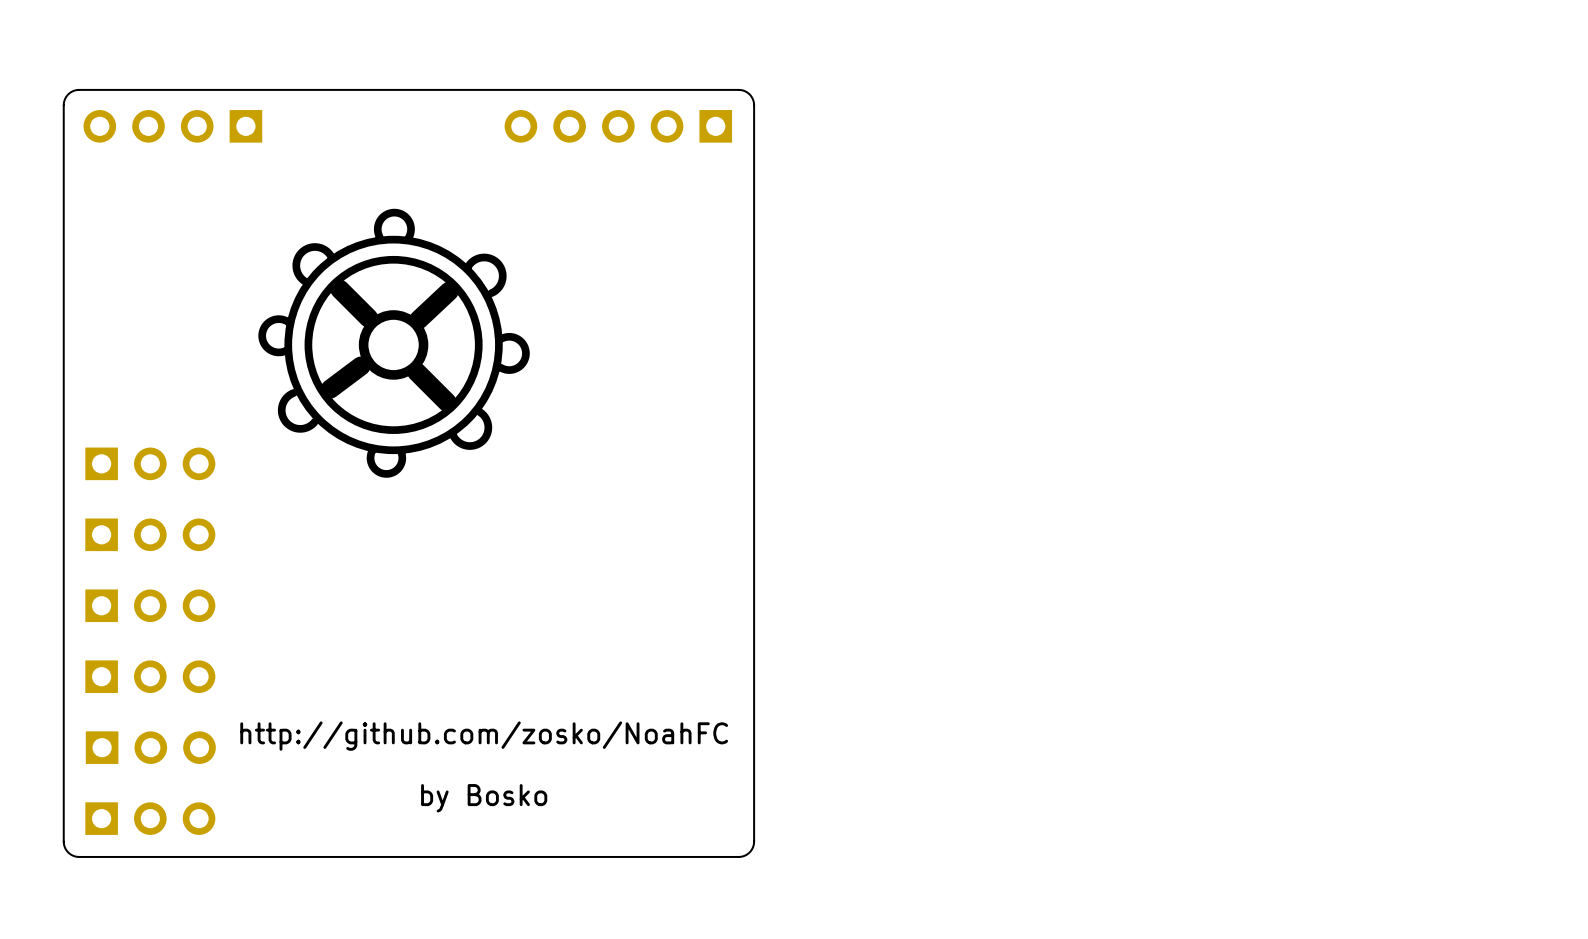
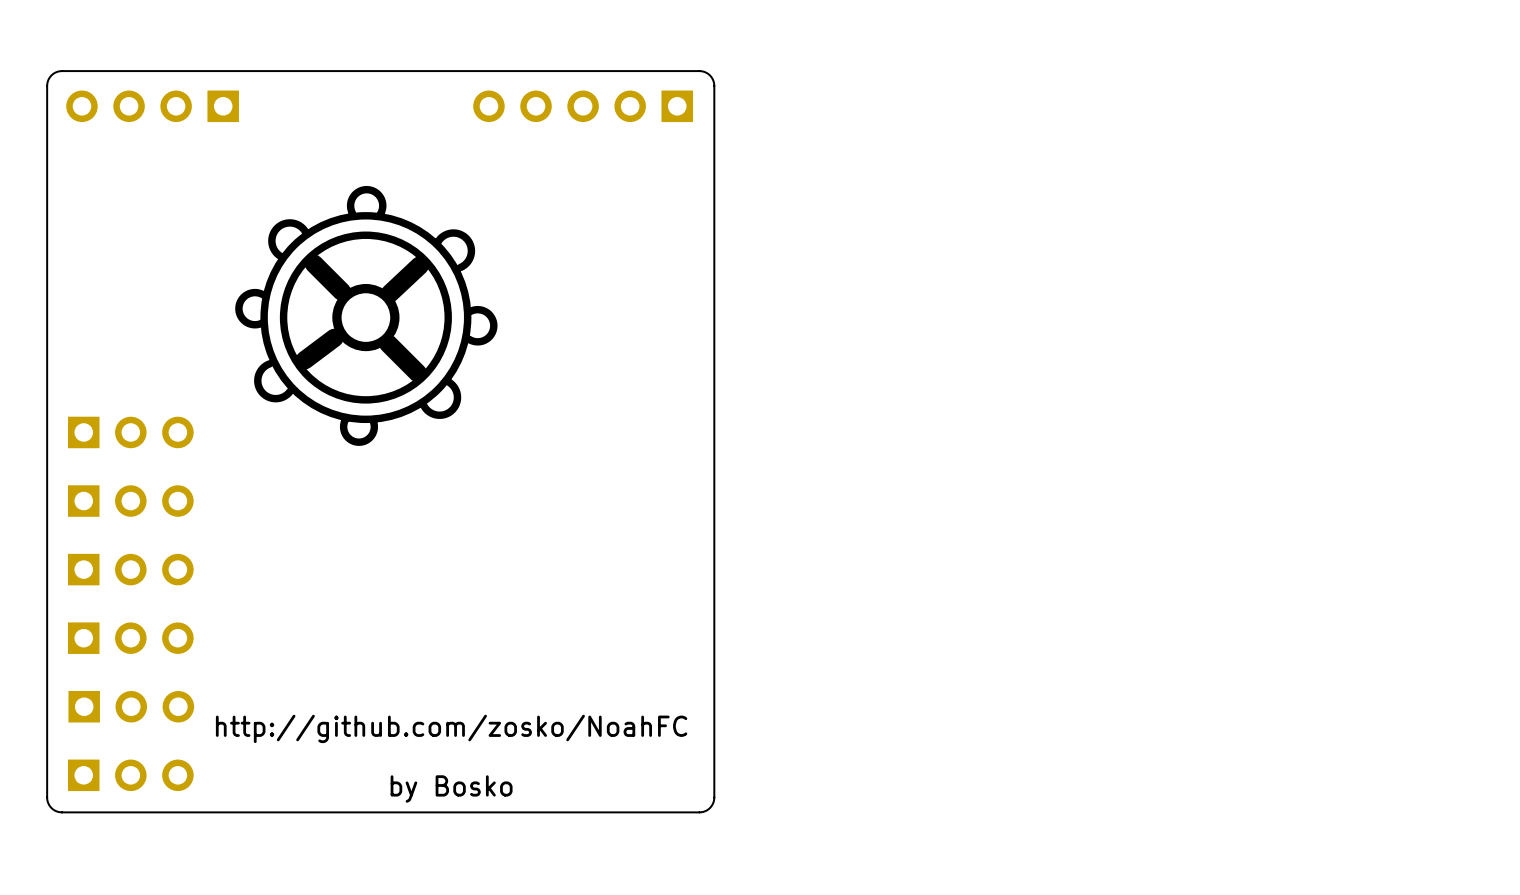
text position: http://github.com/zosko/NoahFC (484, 736) -> http://github.com/zosko/NoahFC (451, 728)
text position: by Bosko (484, 798) -> by Bosko (451, 789)

